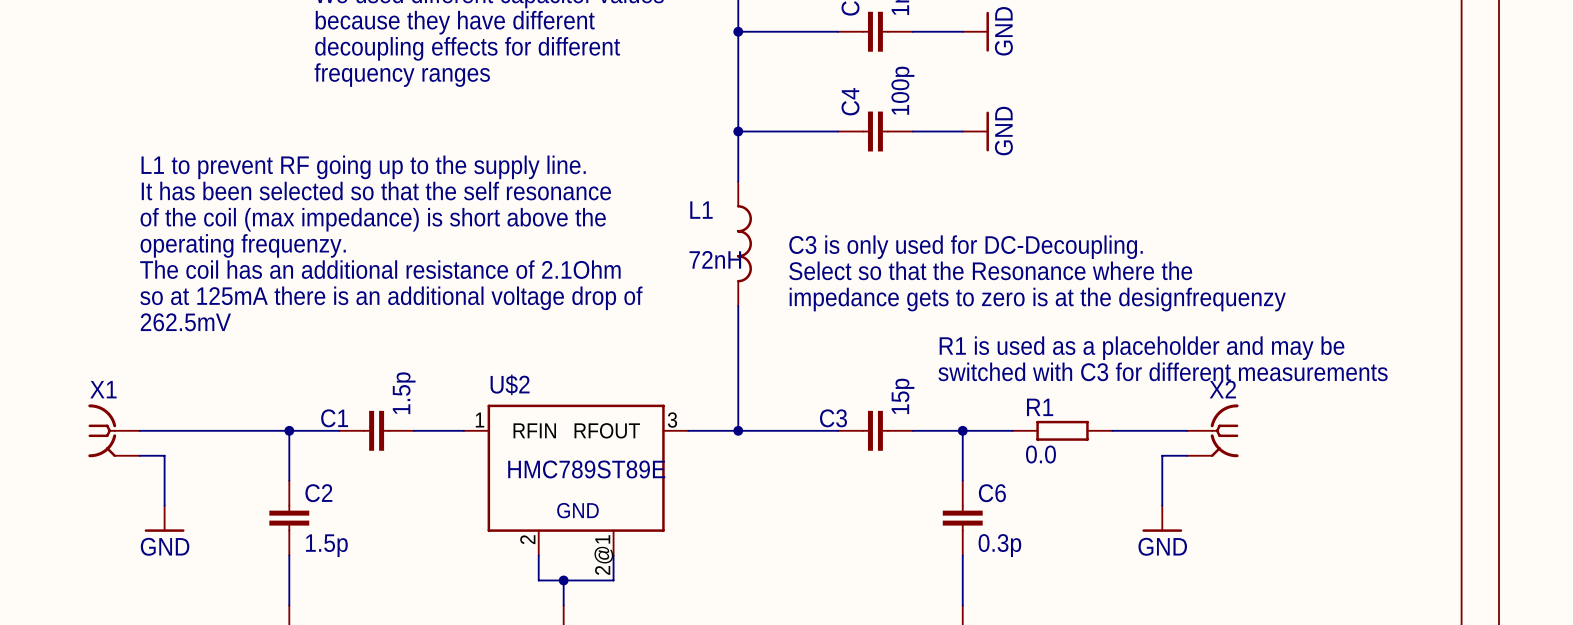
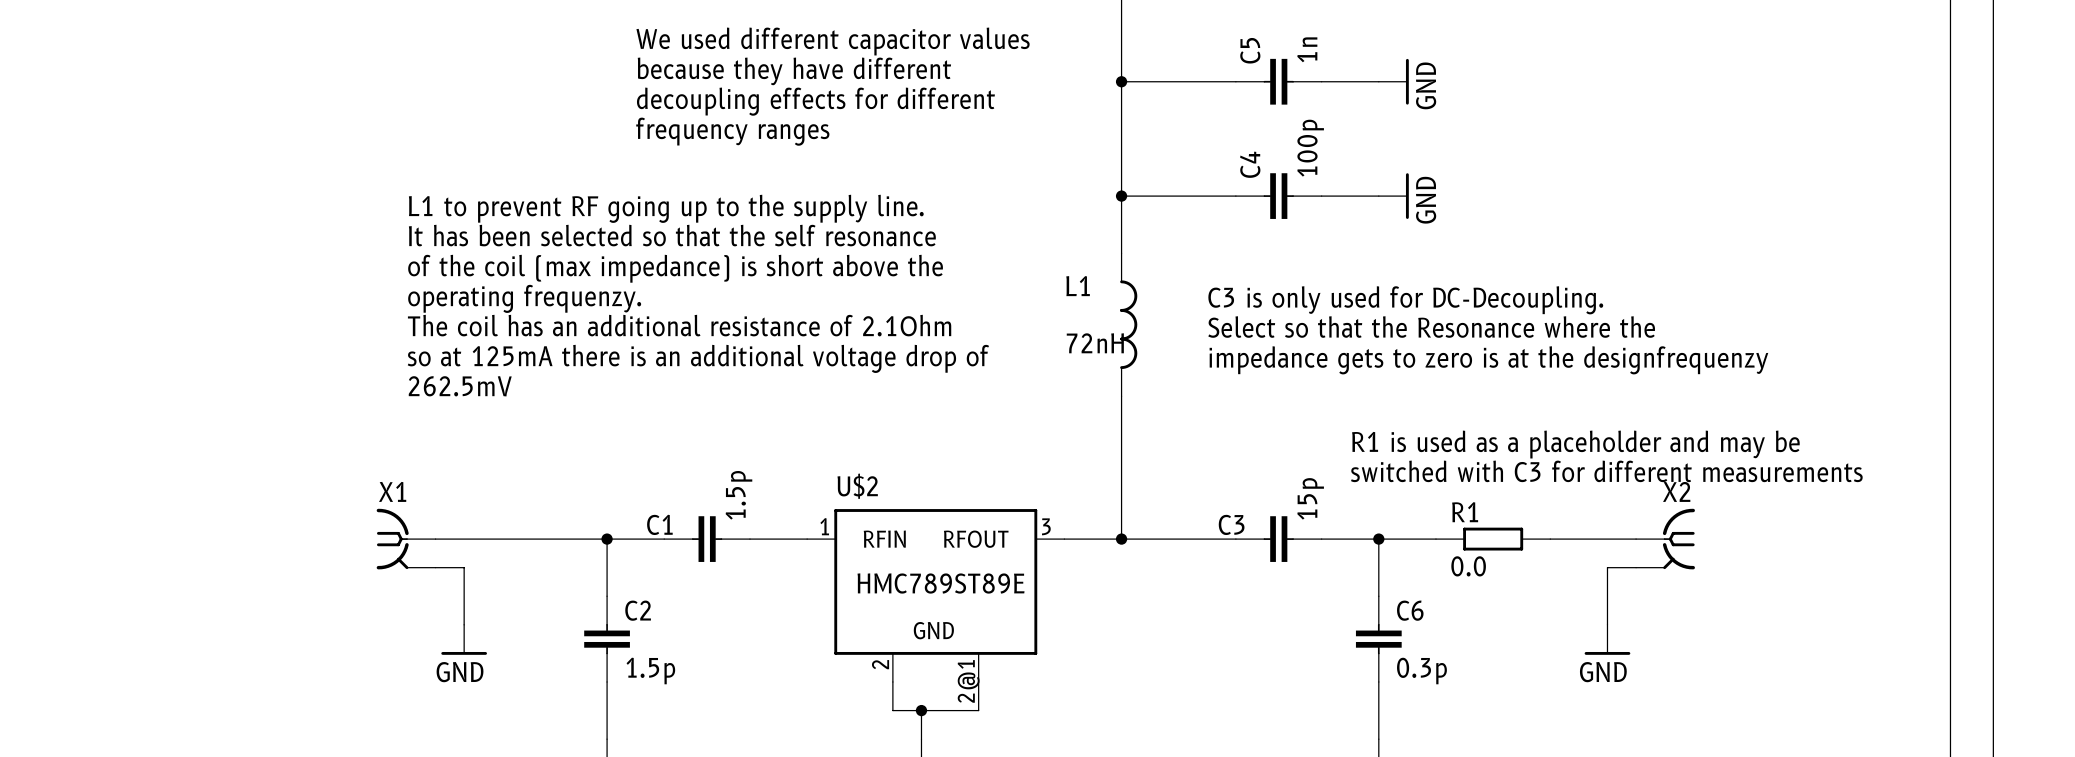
text position: L1 to prevent RF going up to the supply line. (363, 167) -> L1 to prevent RF going up to the supply line. (666, 208)
text position: It has been selected so that the self resonance (376, 191) -> It has been selected so that the self resonance (672, 235)
text position: of the coil (max impedance) is short above the (373, 219) -> of the coil (max impedance) is short above the (675, 268)
text position: operating frequenzy. (243, 245) -> operating frequenzy. (524, 298)
text position: C3 is only used for DC-Decoupling. (966, 247) -> C3 is only used for DC-Decoupling. (1405, 300)
text position: The coil has an additional resistance of 2.1Ohm (380, 269) -> The coil has an additional resistance of 2.1Ohm (679, 325)
text position: Select so that the Resonance where the (990, 270) -> Select so that the Resonance where the (1431, 327)
text position: so at 125mA there is an additional voltage drop of (391, 298) -> so at 125mA there is an additional voltage drop of (698, 358)
text position: impedance gets to zero is at the designfrequenzy (1037, 299) -> impedance gets to zero is at the designfrequenzy (1488, 360)
text position: 262.5mV (185, 322) -> 262.5mV (460, 386)

